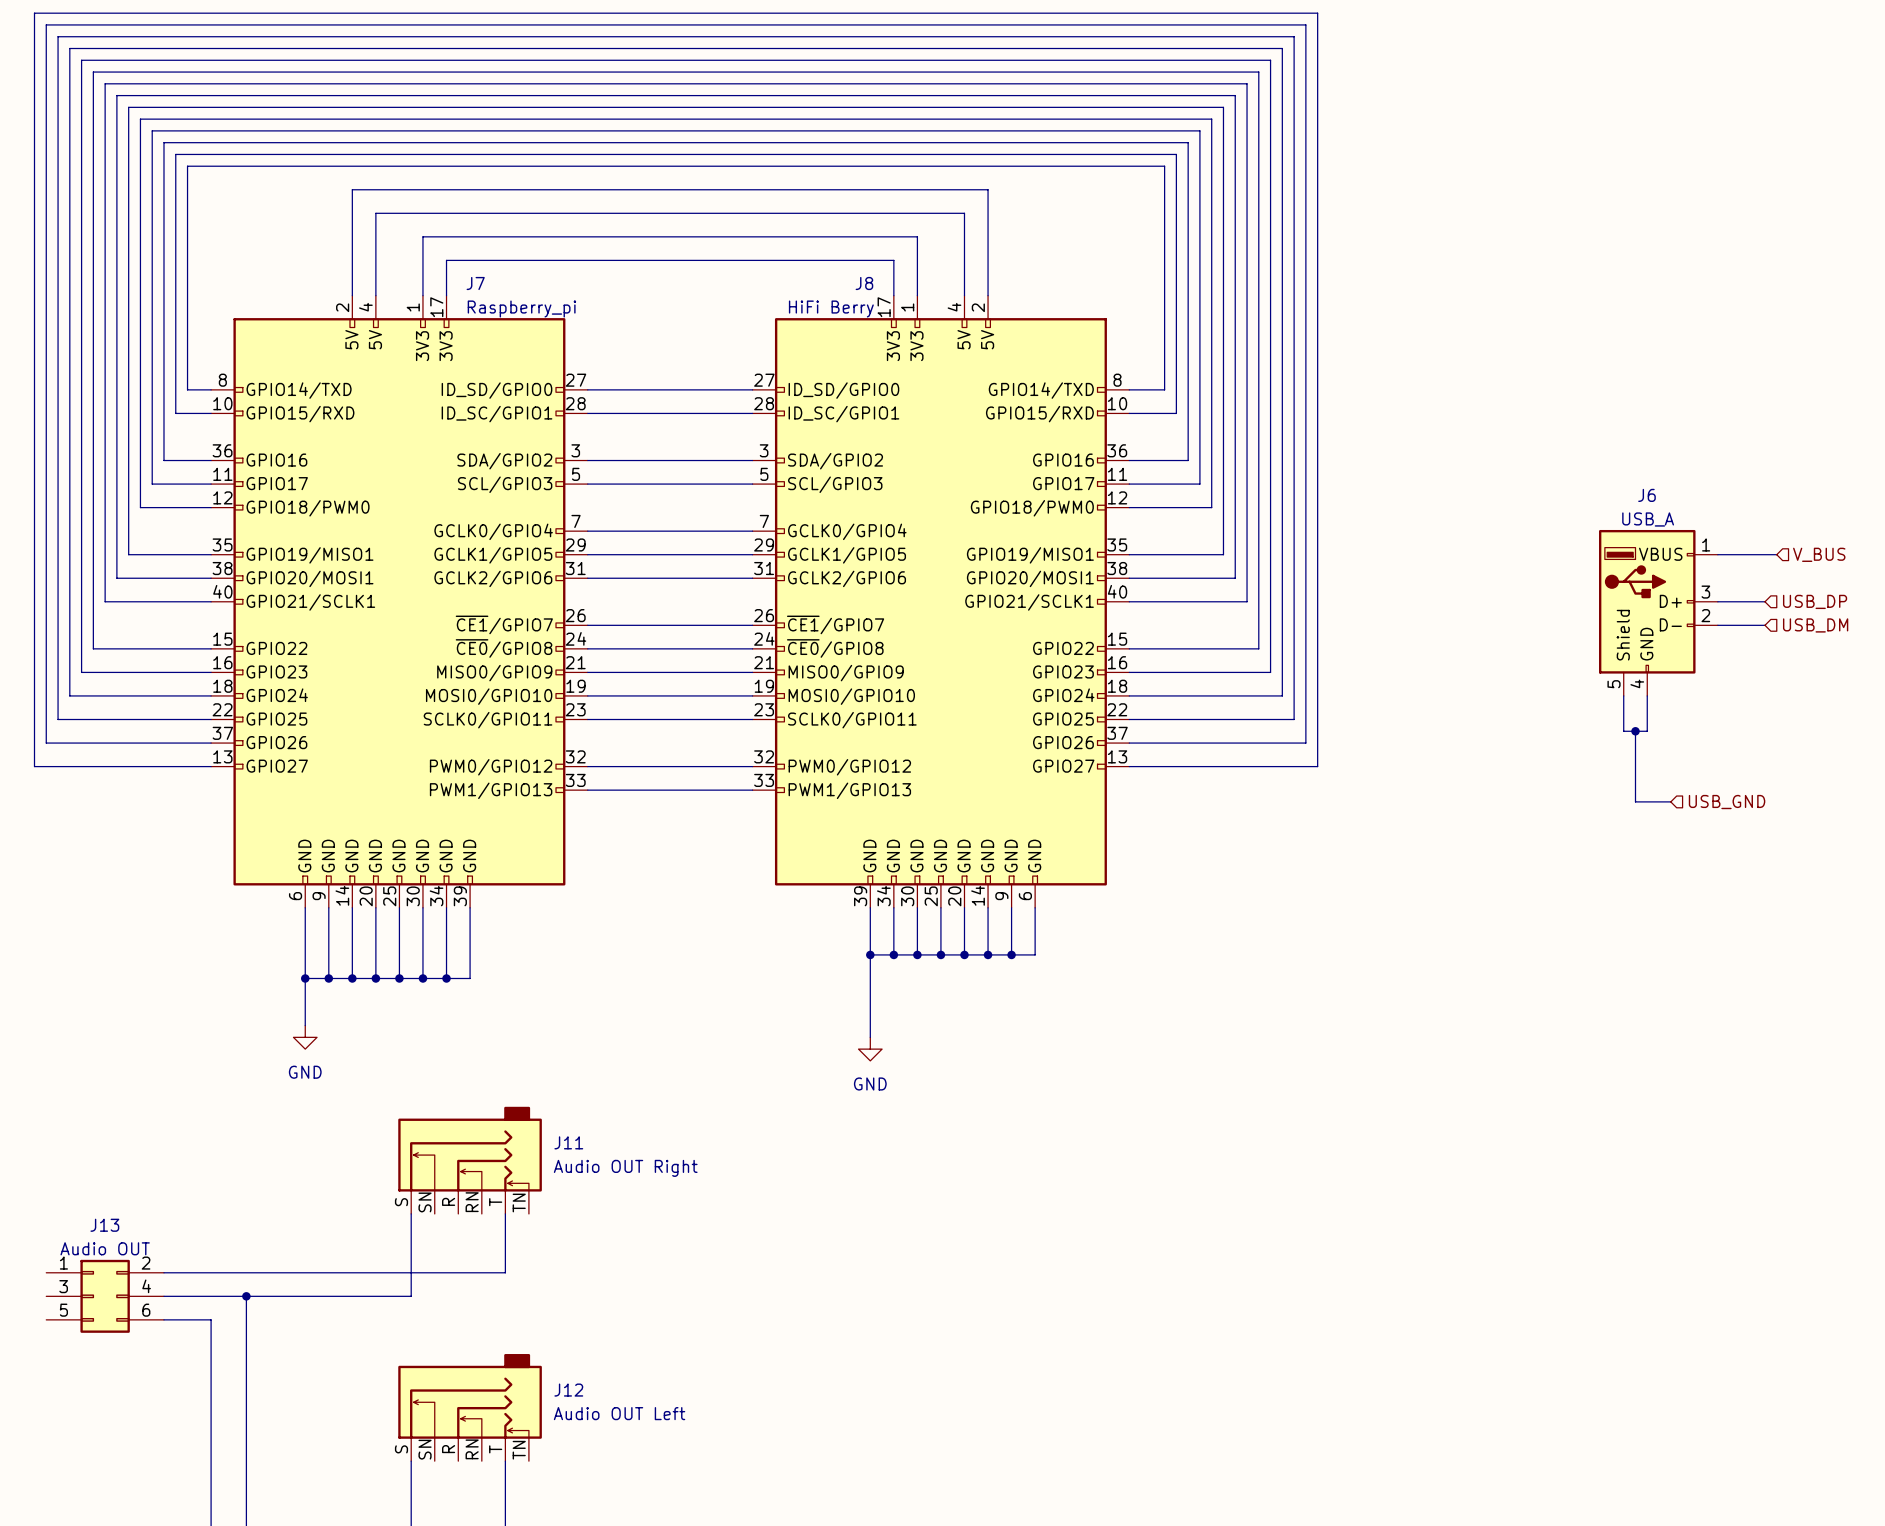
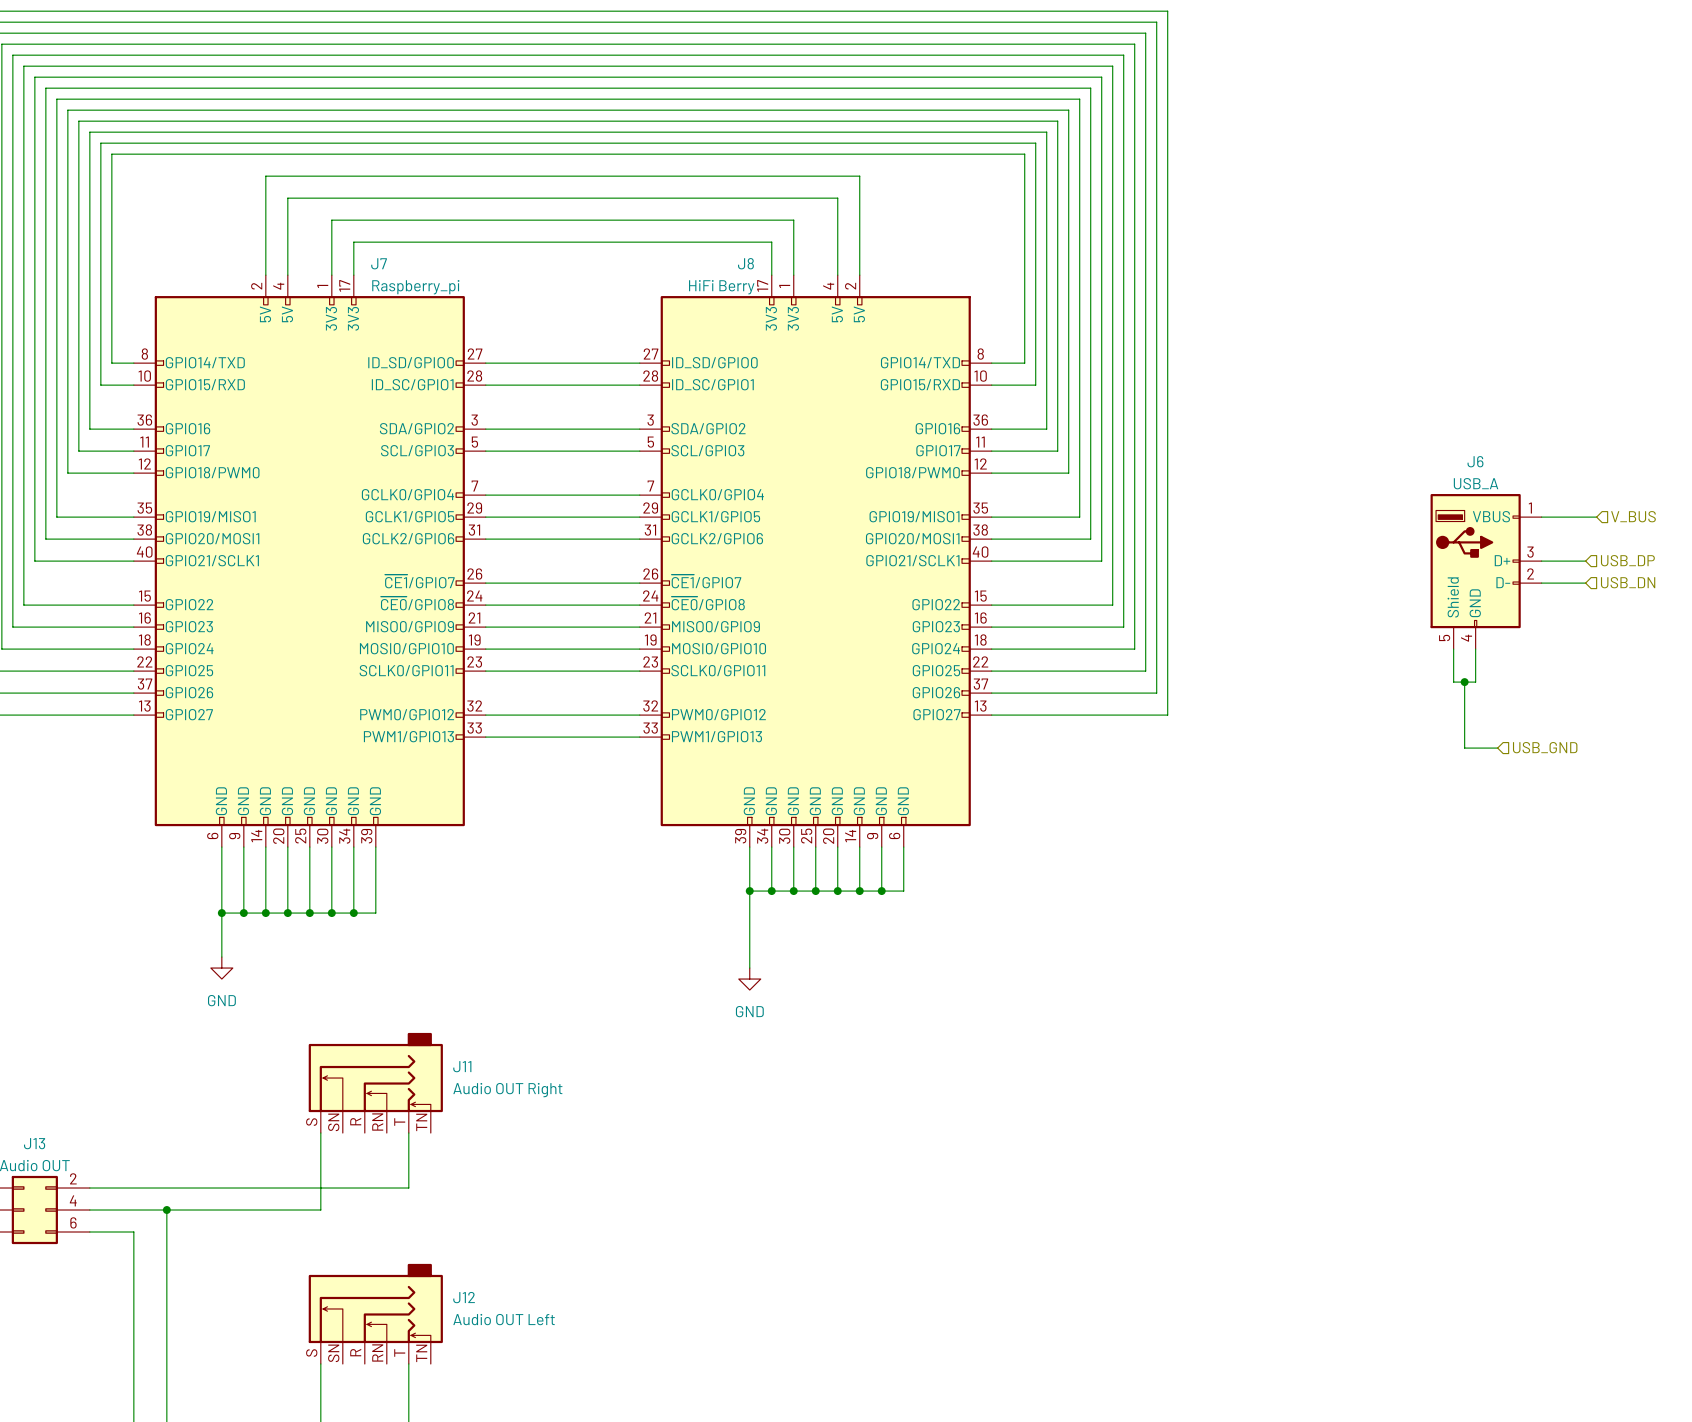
hierarchical label: USB_DM (1815, 625) -> USB_DN (1628, 582)

